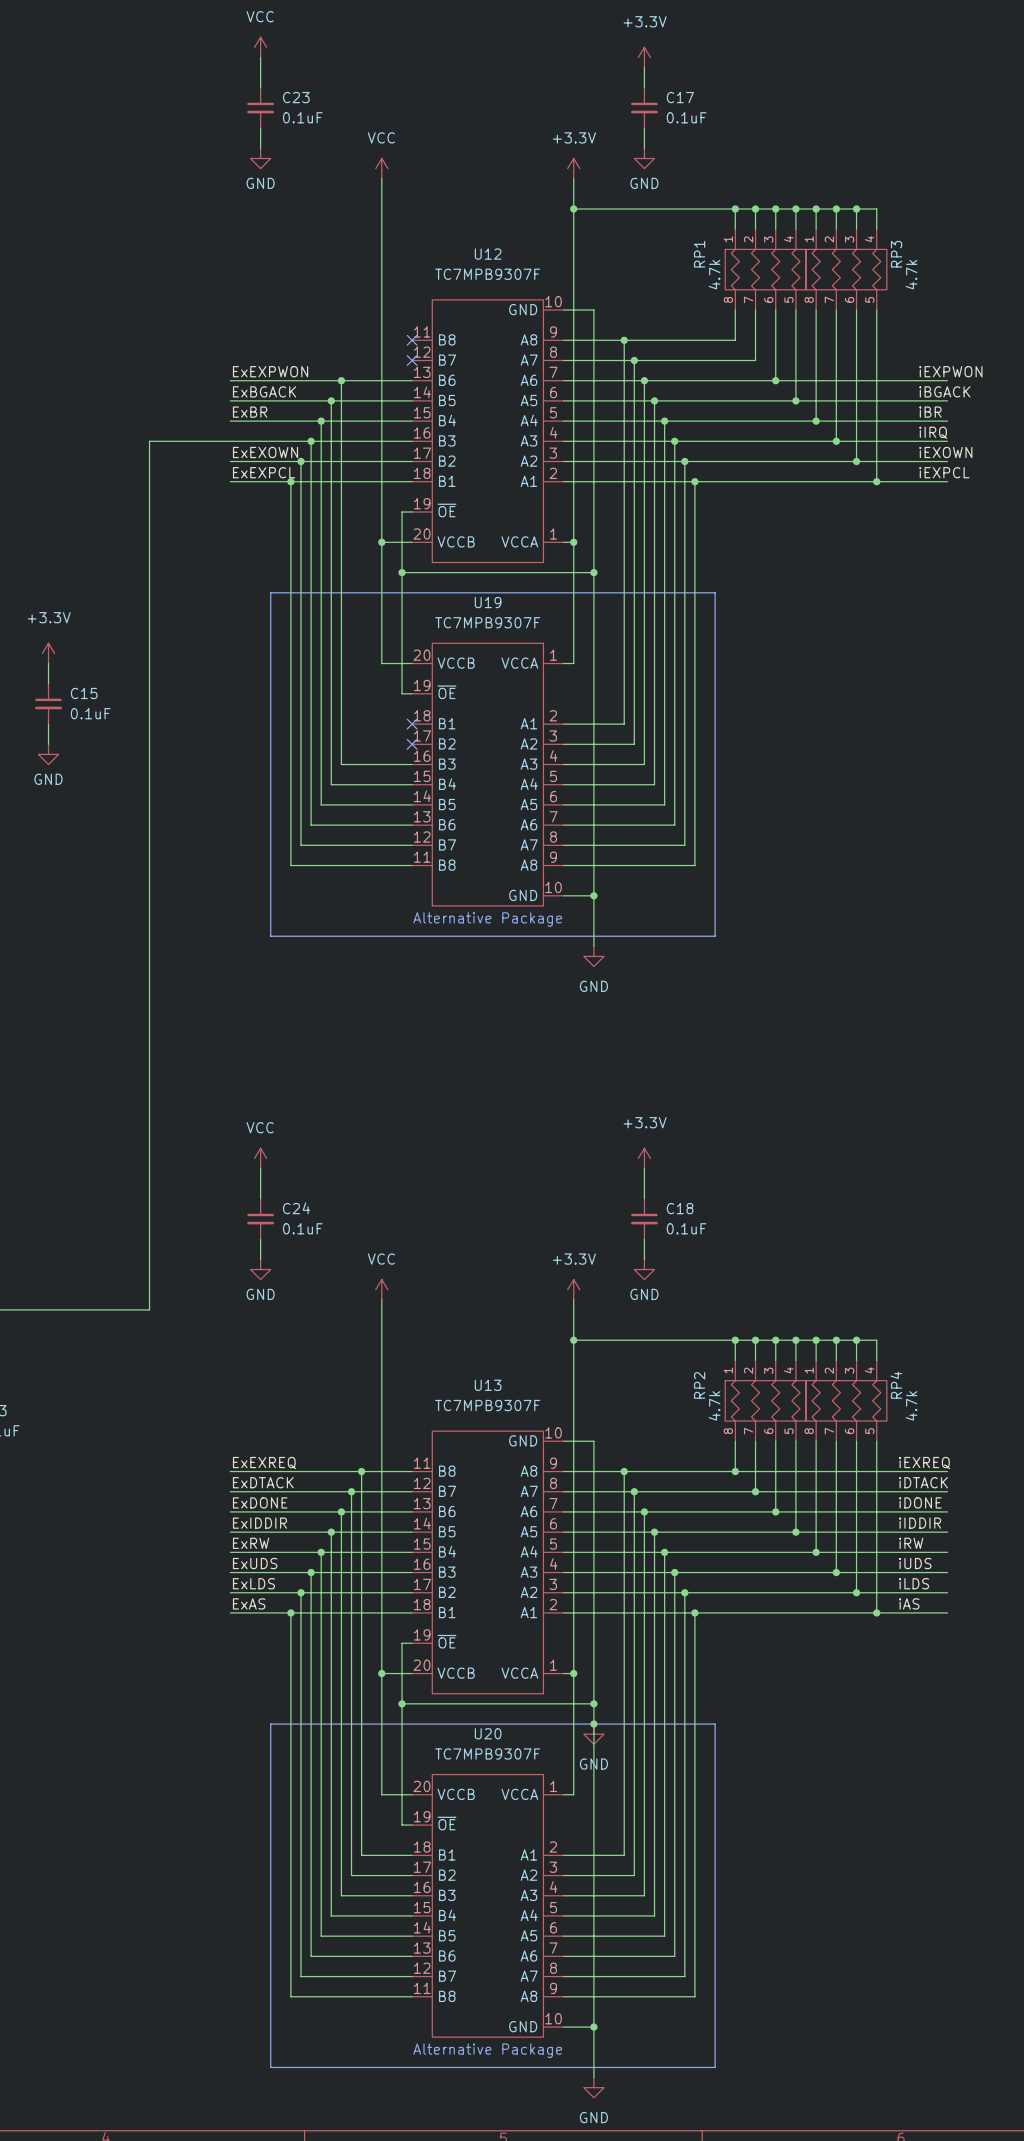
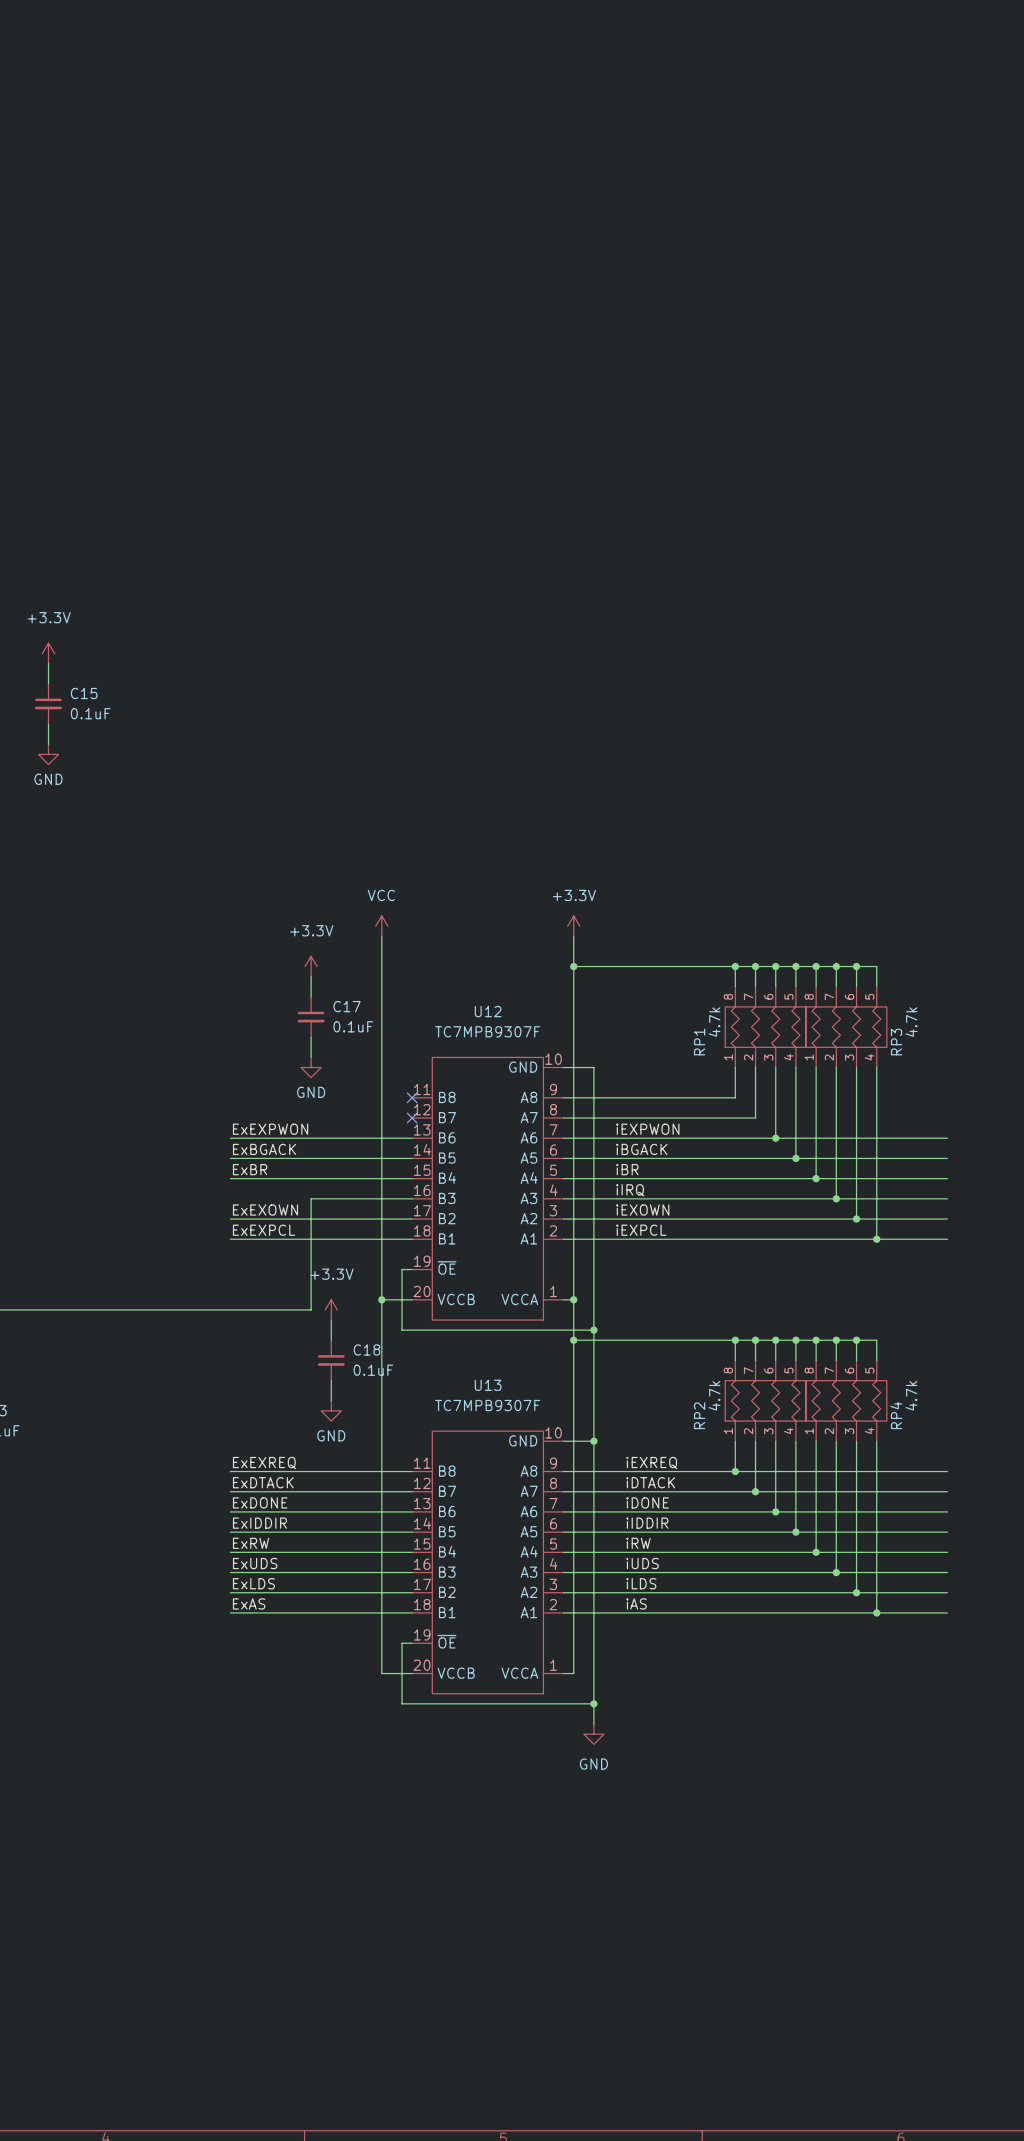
power symbol: VCC (260, 47) -> none
wire: (260, 57) (260, 87) -> none
power symbol: +3.3V (644, 57) -> none
wire: (644, 67) (644, 87) -> none
C23: 0.1uF (260, 107) -> none
C17 position: (644, 107) -> (311, 1017)
wire: (260, 128) (260, 148) -> none
wire: (644, 128) (644, 148) -> none
power symbol: GND (260, 158) -> none
power symbol: GND (644, 158) -> none
power symbol: VCC (381, 168) -> none
power symbol: +3.3V (573, 168) -> none
wire: (381, 178) (381, 663) (412, 663) -> none
wire: (573, 178) (573, 663) (563, 663) -> none
wire: (573, 209) (876, 209) (876, 229) -> none
junction: (573, 209) -> none
wire: (735, 209) (735, 229) -> none
junction: (735, 209) -> none
wire: (755, 209) (755, 229) -> none
junction: (755, 209) -> none
wire: (775, 209) (775, 229) -> none
junction: (775, 209) -> none
wire: (795, 209) (795, 229) -> none
junction: (795, 209) -> none
wire: (816, 209) (816, 229) -> none
junction: (816, 209) -> none
wire: (836, 209) (836, 229) -> none
junction: (836, 209) -> none
wire: (856, 209) (856, 229) -> none
junction: (856, 209) -> none
RP1 flip: as is (765, 269) -> up-down (765, 1027)
RP1 position: (765, 269) -> (765, 1027)
RP3 flip: as is (846, 269) -> up-down (846, 1027)
RP3 position: (846, 269) -> (846, 1027)
wire: (563, 310) (593, 310) (593, 946) -> none
wire: (735, 310) (735, 340) (563, 340) -> none
wire: (755, 310) (755, 360) (563, 360) -> none
wire: (775, 310) (775, 380) -> none
wire: (795, 310) (795, 400) -> none
wire: (816, 310) (816, 421) -> none
wire: (836, 310) (836, 441) -> none
wire: (856, 310) (856, 461) -> none
wire: (876, 310) (876, 481) -> none
no-connect mark: (412, 340) -> none
wire: (624, 340) (624, 724) (563, 724) -> none
junction: (624, 340) -> none
no-connect mark: (412, 360) -> none
wire: (634, 360) (634, 744) (563, 744) -> none
junction: (634, 360) -> none
label: ExEXPWON (270, 371) -> none
label: iEXPWON (950, 371) -> none
wire: (230, 380) (412, 380) -> none
wire: (341, 380) (341, 764) (412, 764) -> none
junction: (341, 380) -> none
wire: (563, 380) (947, 380) -> none
wire: (644, 380) (644, 764) (563, 764) -> none
junction: (644, 380) -> none
junction: (775, 380) -> none
label: ExBGACK (264, 391) -> none
label: iBGACK (944, 391) -> none
wire: (230, 400) (412, 400) -> none
wire: (331, 400) (331, 784) (412, 784) -> none
junction: (331, 400) -> none
wire: (563, 400) (947, 400) -> none
wire: (654, 400) (654, 784) (563, 784) -> none
junction: (654, 400) -> none
junction: (795, 400) -> none
label: ExBR (250, 412) -> none
label: iBR (930, 412) -> none
wire: (230, 421) (412, 421) -> none
wire: (321, 421) (321, 804) (412, 804) -> none
junction: (321, 421) -> none
wire: (563, 421) (947, 421) -> none
wire: (664, 421) (664, 804) (563, 804) -> none
junction: (664, 421) -> none
junction: (816, 421) -> none
U12 position: (487, 431) -> (487, 1188)
label: iIRQ (933, 432) -> none
wire: (311, 441) (311, 825) (412, 825) -> none
junction: (311, 441) -> none
wire: (412, 441) (149, 441) (149, 1309) -> (412, 1198) (311, 1198) (311, 1309) (149, 1309)
wire: (563, 441) (947, 441) -> none
wire: (674, 441) (674, 825) (563, 825) -> none
junction: (674, 441) -> none
junction: (836, 441) -> none
label: ExEXOWN (265, 452) -> none
label: iEXOWN (945, 452) -> none
wire: (230, 461) (412, 461) -> none
wire: (301, 461) (301, 845) (412, 845) -> none
junction: (301, 461) -> none
wire: (563, 461) (947, 461) -> none
wire: (684, 461) (684, 845) (563, 845) -> none
junction: (684, 461) -> none
junction: (856, 461) -> none
label: ExEXPCL (264, 472) -> none
label: iEXPCL (944, 472) -> none
wire: (230, 481) (412, 481) -> none
wire: (290, 481) (290, 865) (412, 865) -> none
junction: (290, 481) -> none
wire: (563, 481) (947, 481) -> none
wire: (694, 481) (694, 865) (563, 865) -> none
junction: (694, 481) -> none
junction: (876, 481) -> none
wire: (412, 512) (402, 512) (402, 693) (412, 693) -> none
wire: (381, 542) (412, 542) -> none
junction: (381, 542) -> none
wire: (563, 542) (573, 542) -> none
junction: (573, 542) -> none
wire: (402, 572) (593, 572) -> none
junction: (402, 572) -> none
junction: (593, 572) -> none
line: (270, 592) (715, 592) (715, 936) (270, 936) (270, 592) -> none
no-connect mark: (412, 724) -> none
no-connect mark: (412, 744) -> none
U19: TC7MPB9307F (487, 774) -> none
wire: (563, 895) (593, 895) -> none
junction: (593, 895) -> none
text: Alternative Package (487, 919) -> none
power symbol: none -> VCC (381, 926)
power symbol: none -> +3.3V (573, 926)
wire: none -> (381, 936) (381, 1299) (412, 1299)
wire: none -> (573, 936) (573, 1299) (563, 1299)
power symbol: GND (593, 956) -> none
power symbol: none -> +3.3V (311, 966)
wire: none -> (573, 966) (876, 966) (876, 986)
junction: none -> (573, 966)
wire: none -> (735, 966) (735, 986)
junction: none -> (735, 966)
wire: none -> (755, 966) (755, 986)
junction: none -> (755, 966)
wire: none -> (775, 966) (775, 986)
junction: none -> (775, 966)
wire: none -> (795, 966) (795, 986)
junction: none -> (795, 966)
wire: none -> (816, 966) (816, 986)
junction: none -> (816, 966)
wire: none -> (836, 966) (836, 986)
junction: none -> (836, 966)
wire: none -> (856, 966) (856, 986)
junction: none -> (856, 966)
wire: none -> (311, 976) (311, 996)
wire: none -> (311, 1037) (311, 1057)
power symbol: none -> GND (311, 1067)
wire: none -> (563, 1067) (593, 1067) (593, 1441)
wire: none -> (735, 1067) (735, 1097) (563, 1097)
wire: none -> (755, 1067) (755, 1118) (563, 1118)
wire: none -> (775, 1067) (775, 1138)
wire: none -> (795, 1067) (795, 1158)
wire: none -> (816, 1067) (816, 1178)
wire: none -> (836, 1067) (836, 1198)
wire: none -> (856, 1067) (856, 1219)
wire: none -> (876, 1067) (876, 1239)
no-connect mark: none -> (412, 1097)
no-connect mark: none -> (412, 1118)
label: none -> ExEXPWON (270, 1129)
label: none -> iEXPWON (647, 1129)
wire: none -> (230, 1138) (412, 1138)
wire: none -> (563, 1138) (947, 1138)
junction: none -> (775, 1138)
label: none -> ExBGACK (264, 1149)
label: none -> iBGACK (641, 1149)
wire: none -> (230, 1158) (412, 1158)
power symbol: VCC (260, 1158) -> none
wire: none -> (563, 1158) (947, 1158)
power symbol: +3.3V (644, 1158) -> none
junction: none -> (795, 1158)
wire: (260, 1168) (260, 1198) -> none
wire: (644, 1168) (644, 1198) -> none
label: none -> ExBR (250, 1169)
label: none -> iBR (627, 1169)
wire: none -> (230, 1178) (412, 1178)
wire: none -> (563, 1178) (947, 1178)
junction: none -> (816, 1178)
label: none -> iIRQ (630, 1190)
wire: none -> (563, 1198) (947, 1198)
junction: none -> (836, 1198)
label: none -> ExEXOWN (265, 1210)
label: none -> iEXOWN (642, 1210)
wire: none -> (230, 1219) (412, 1219)
C24: 0.1uF (260, 1219) -> none
wire: none -> (563, 1219) (947, 1219)
C18 position: (644, 1219) -> (331, 1360)
junction: none -> (856, 1219)
label: none -> ExEXPCL (264, 1230)
label: none -> iEXPCL (641, 1230)
wire: none -> (230, 1239) (412, 1239)
wire: (260, 1239) (260, 1259) -> (331, 1320) (331, 1340)
wire: none -> (563, 1239) (947, 1239)
wire: (644, 1239) (644, 1259) -> none
junction: none -> (876, 1239)
power symbol: GND (260, 1269) -> none
wire: none -> (412, 1269) (402, 1269) (402, 1330) (593, 1330)
power symbol: GND (644, 1269) -> none
power symbol: VCC (381, 1289) -> none
power symbol: +3.3V (573, 1289) -> none
junction: none -> (381, 1299)
junction: none -> (573, 1299)
power symbol: none -> +3.3V (331, 1309)
junction: none -> (593, 1330)
wire: none -> (331, 1380) (331, 1400)
RP2 flip: as is (765, 1400) -> up-down (765, 1400)
RP4 flip: as is (846, 1400) -> up-down (846, 1400)
power symbol: none -> GND (331, 1410)
junction: none -> (593, 1441)
label: none -> iEXREQ (651, 1463)
label: iEXREQ (924, 1463) -> none
wire: (361, 1471) (361, 1855) (412, 1855) -> none
junction: (361, 1471) -> none
wire: (624, 1471) (624, 1855) (563, 1855) -> none
junction: (624, 1471) -> none
label: none -> iDTACK (650, 1482)
label: iDTACK (923, 1482) -> none
wire: (351, 1491) (351, 1875) (412, 1875) -> none
junction: (351, 1491) -> none
wire: (634, 1491) (634, 1875) (563, 1875) -> none
junction: (634, 1491) -> none
label: none -> iDONE (647, 1502)
label: iDONE (920, 1502) -> none
wire: (341, 1511) (341, 1895) (412, 1895) -> none
junction: (341, 1511) -> none
wire: (644, 1511) (644, 1895) (563, 1895) -> none
junction: (644, 1511) -> none
label: none -> iIDDIR (647, 1523)
label: iIDDIR (920, 1523) -> none
wire: (331, 1532) (331, 1915) (412, 1915) -> none
junction: (331, 1532) -> none
wire: (654, 1532) (654, 1915) (563, 1915) -> none
junction: (654, 1532) -> none
label: none -> iRW (638, 1543)
label: iRW (911, 1543) -> none
wire: (321, 1552) (321, 1936) (412, 1936) -> none
junction: (321, 1552) -> none
wire: (664, 1552) (664, 1936) (563, 1936) -> none
junction: (664, 1552) -> none
label: none -> iUDS (642, 1563)
label: iUDS (915, 1563) -> none
wire: (311, 1572) (311, 1956) (412, 1956) -> none
junction: (311, 1572) -> none
wire: (674, 1572) (674, 1956) (563, 1956) -> none
junction: (674, 1572) -> none
label: none -> iLDS (641, 1583)
label: iLDS (914, 1583) -> none
wire: (301, 1592) (301, 1976) (412, 1976) -> none
junction: (301, 1592) -> none
wire: (684, 1592) (684, 1976) (563, 1976) -> none
junction: (684, 1592) -> none
label: none -> iAS (636, 1603)
label: iAS (909, 1603) -> none
wire: (290, 1612) (290, 1996) (412, 1996) -> none
junction: (290, 1612) -> none
wire: (694, 1612) (694, 1996) (563, 1996) -> none
junction: (694, 1612) -> none
wire: (381, 1673) (381, 1794) (412, 1794) -> none
junction: (381, 1673) -> none
wire: (573, 1673) (573, 1794) (563, 1794) -> none
junction: (573, 1673) -> none
wire: (402, 1703) (402, 1825) (412, 1825) -> none
junction: (402, 1703) -> none
line: (270, 1724) (270, 2067) (715, 2067) (715, 1724) (270, 1724) -> none
wire: (593, 1724) (593, 2077) -> none
junction: (593, 1724) -> none
U20: TC7MPB9307F (487, 1905) -> none
wire: (563, 2027) (593, 2027) -> none
junction: (593, 2027) -> none
text: Alternative Package (487, 2050) -> none
power symbol: GND (593, 2087) -> none

